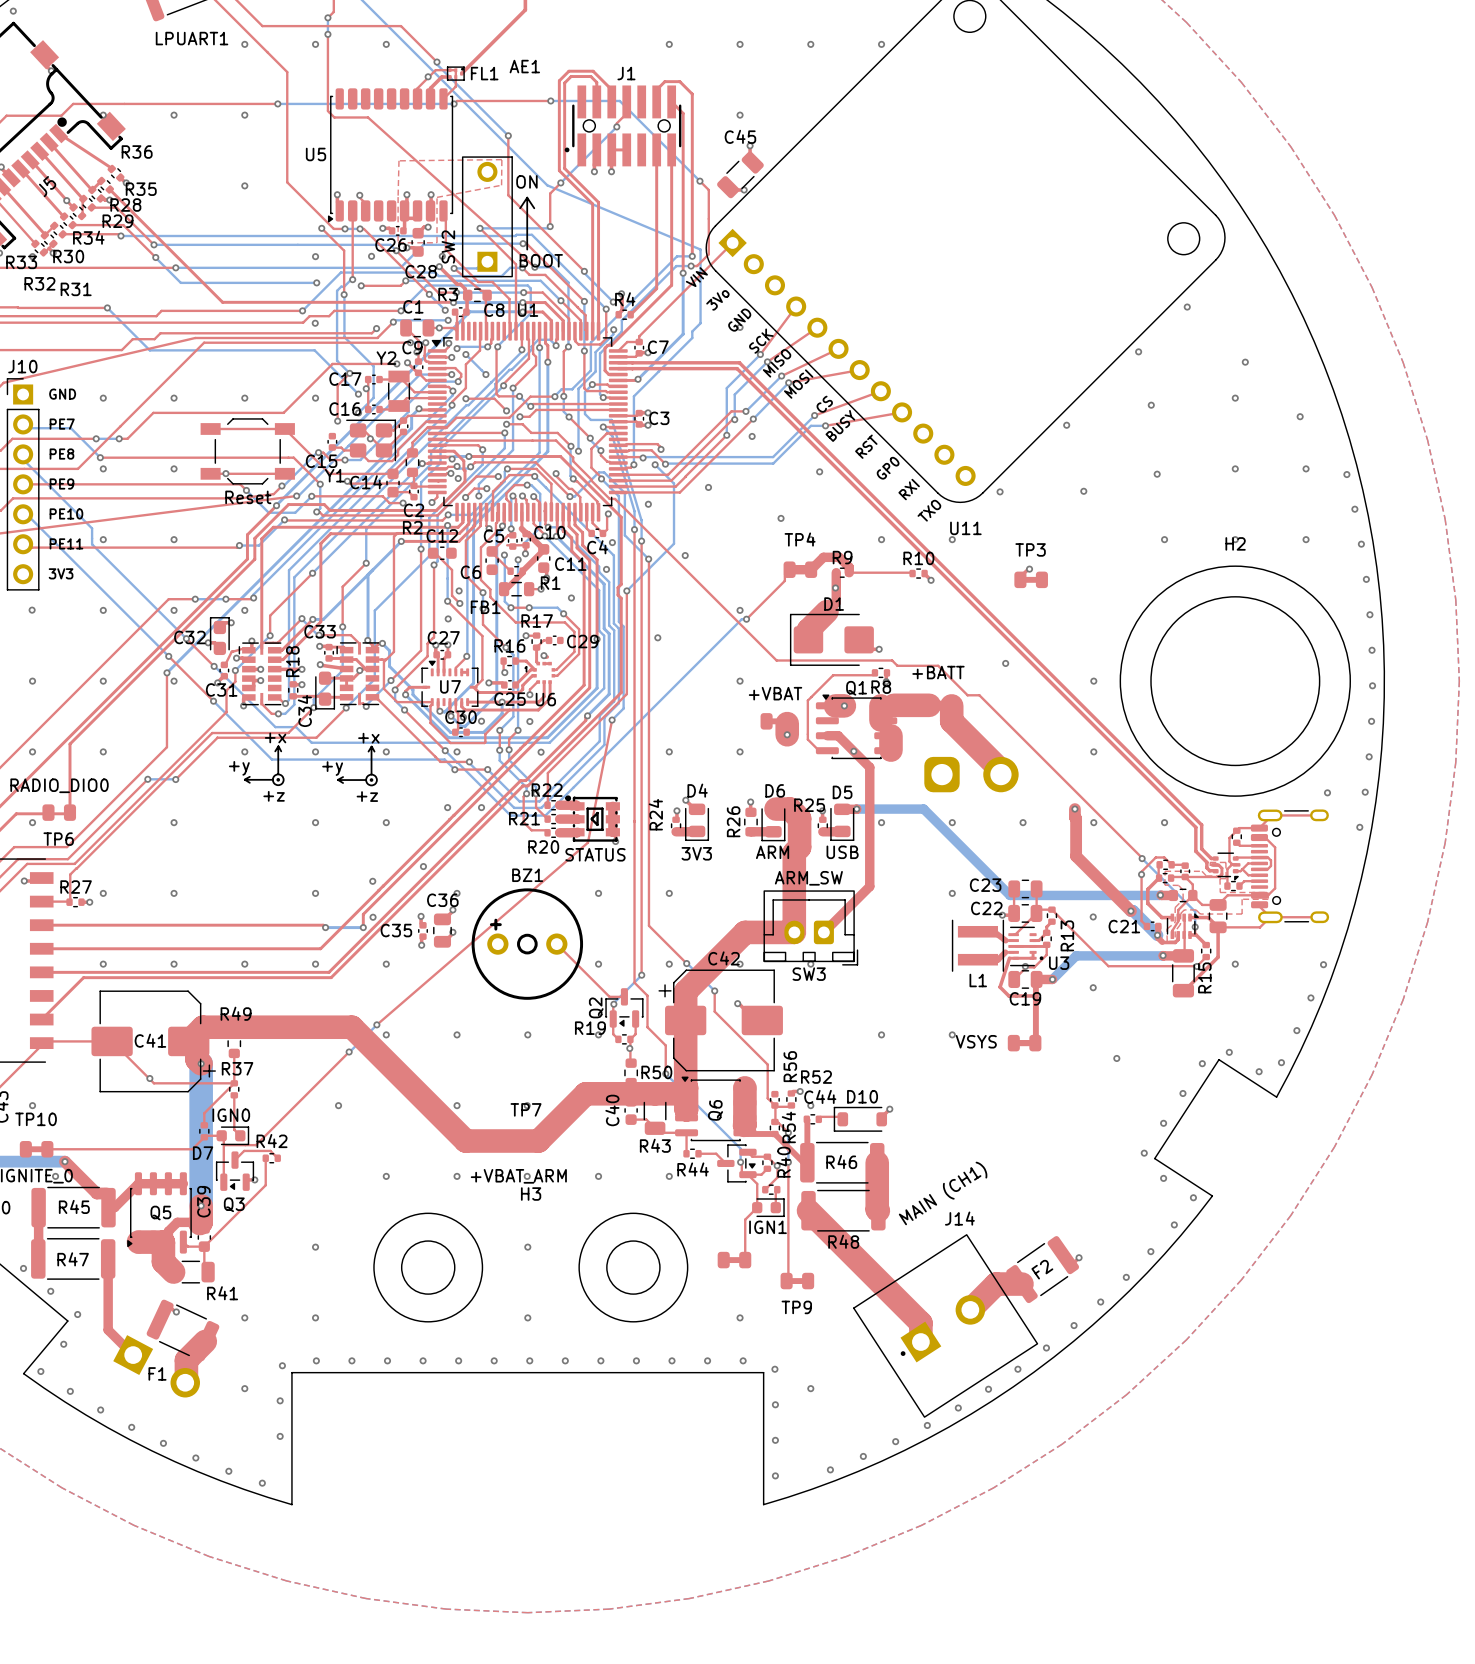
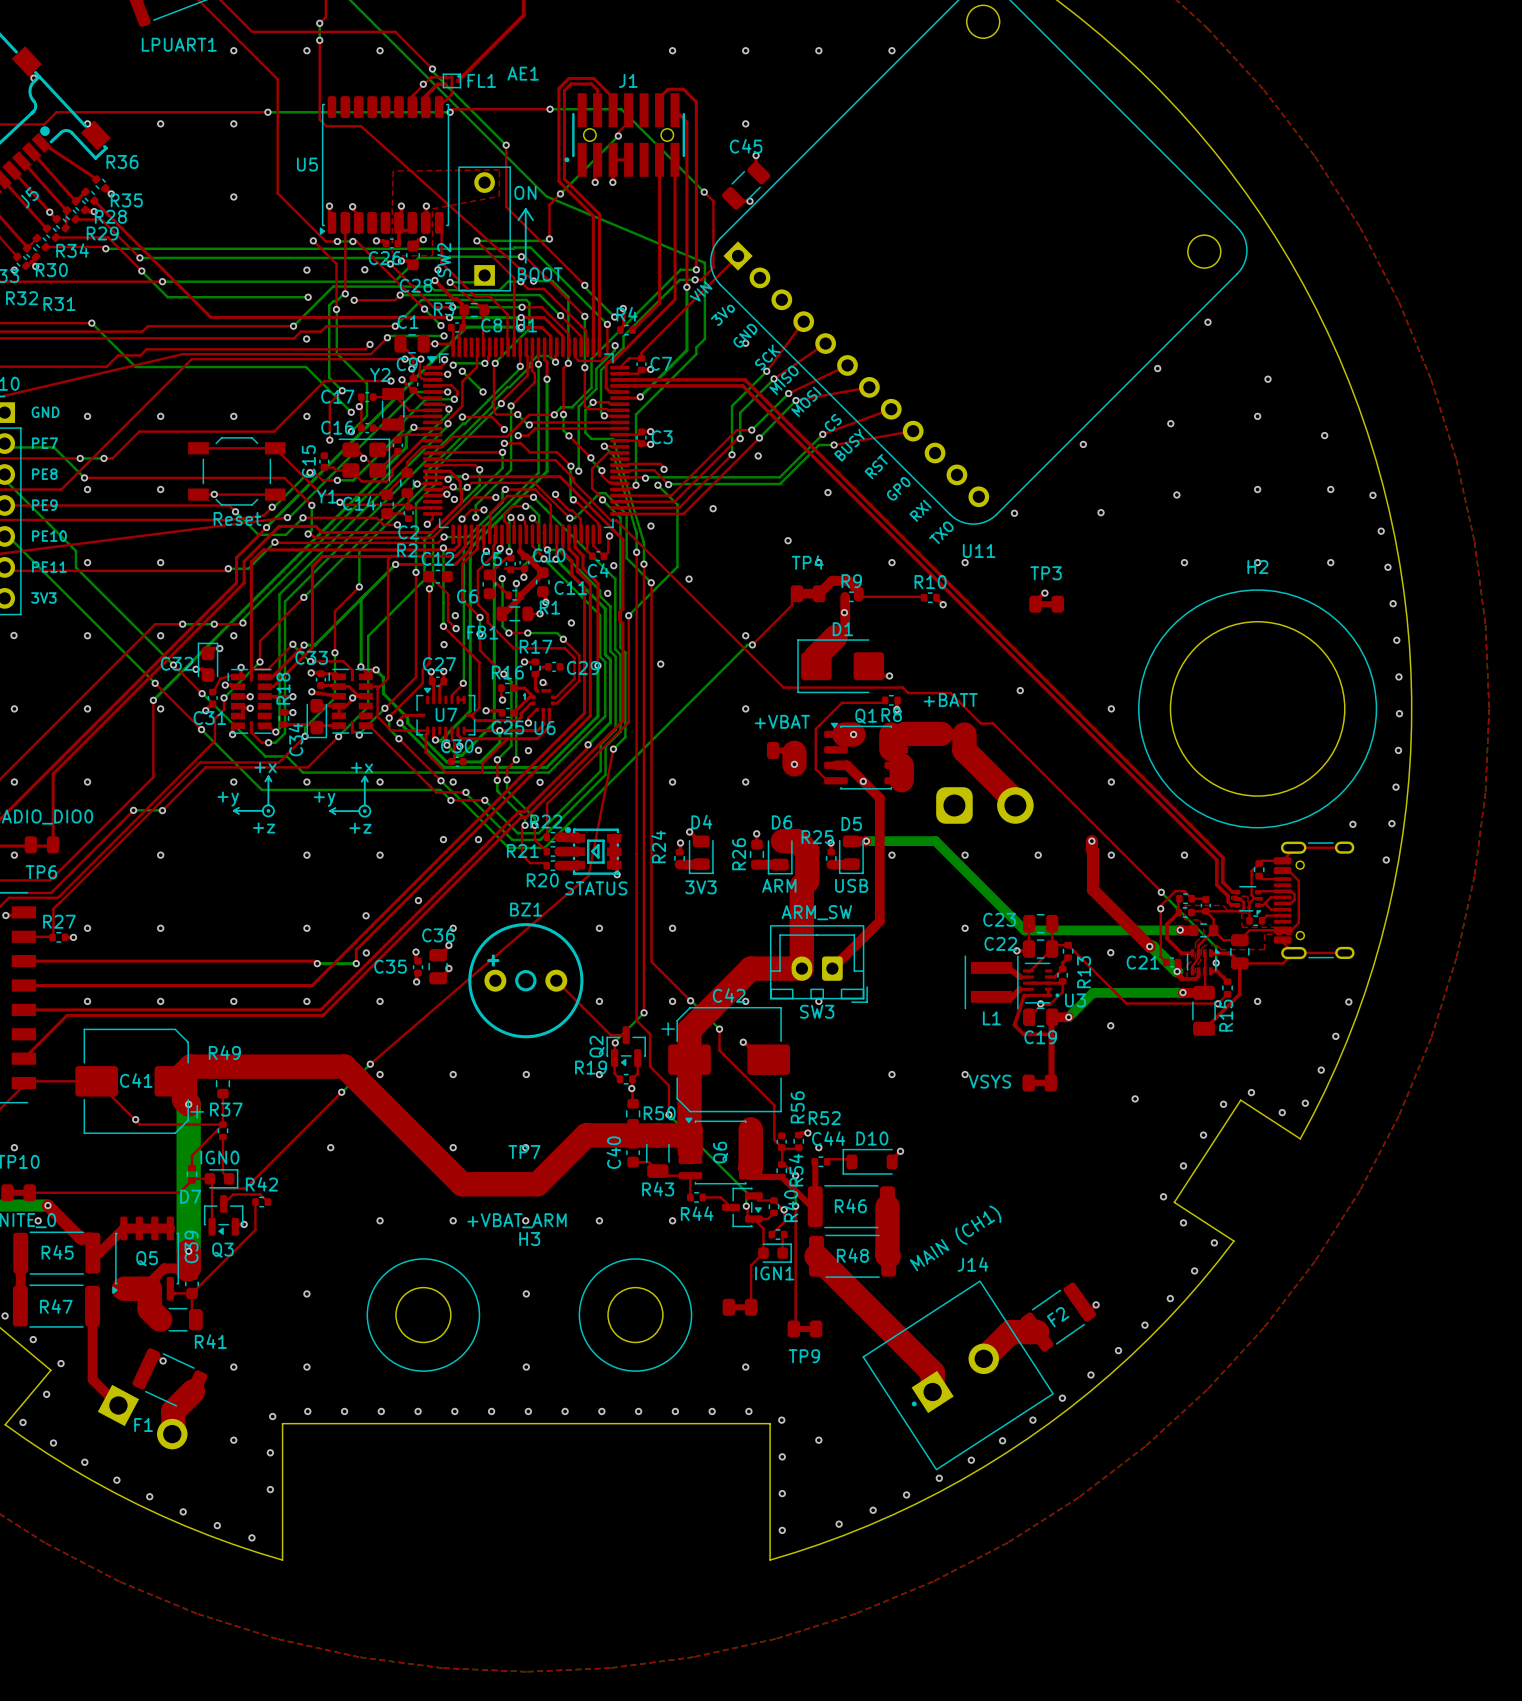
C15 name rotation: 0° (321, 461) -> 90° counterclockwise (308, 461)
Q6 name rotation: 0° (715, 1110) -> 5° counterclockwise (720, 1152)
R48 name position: R48 (843, 1241) -> R48 (852, 1255)

